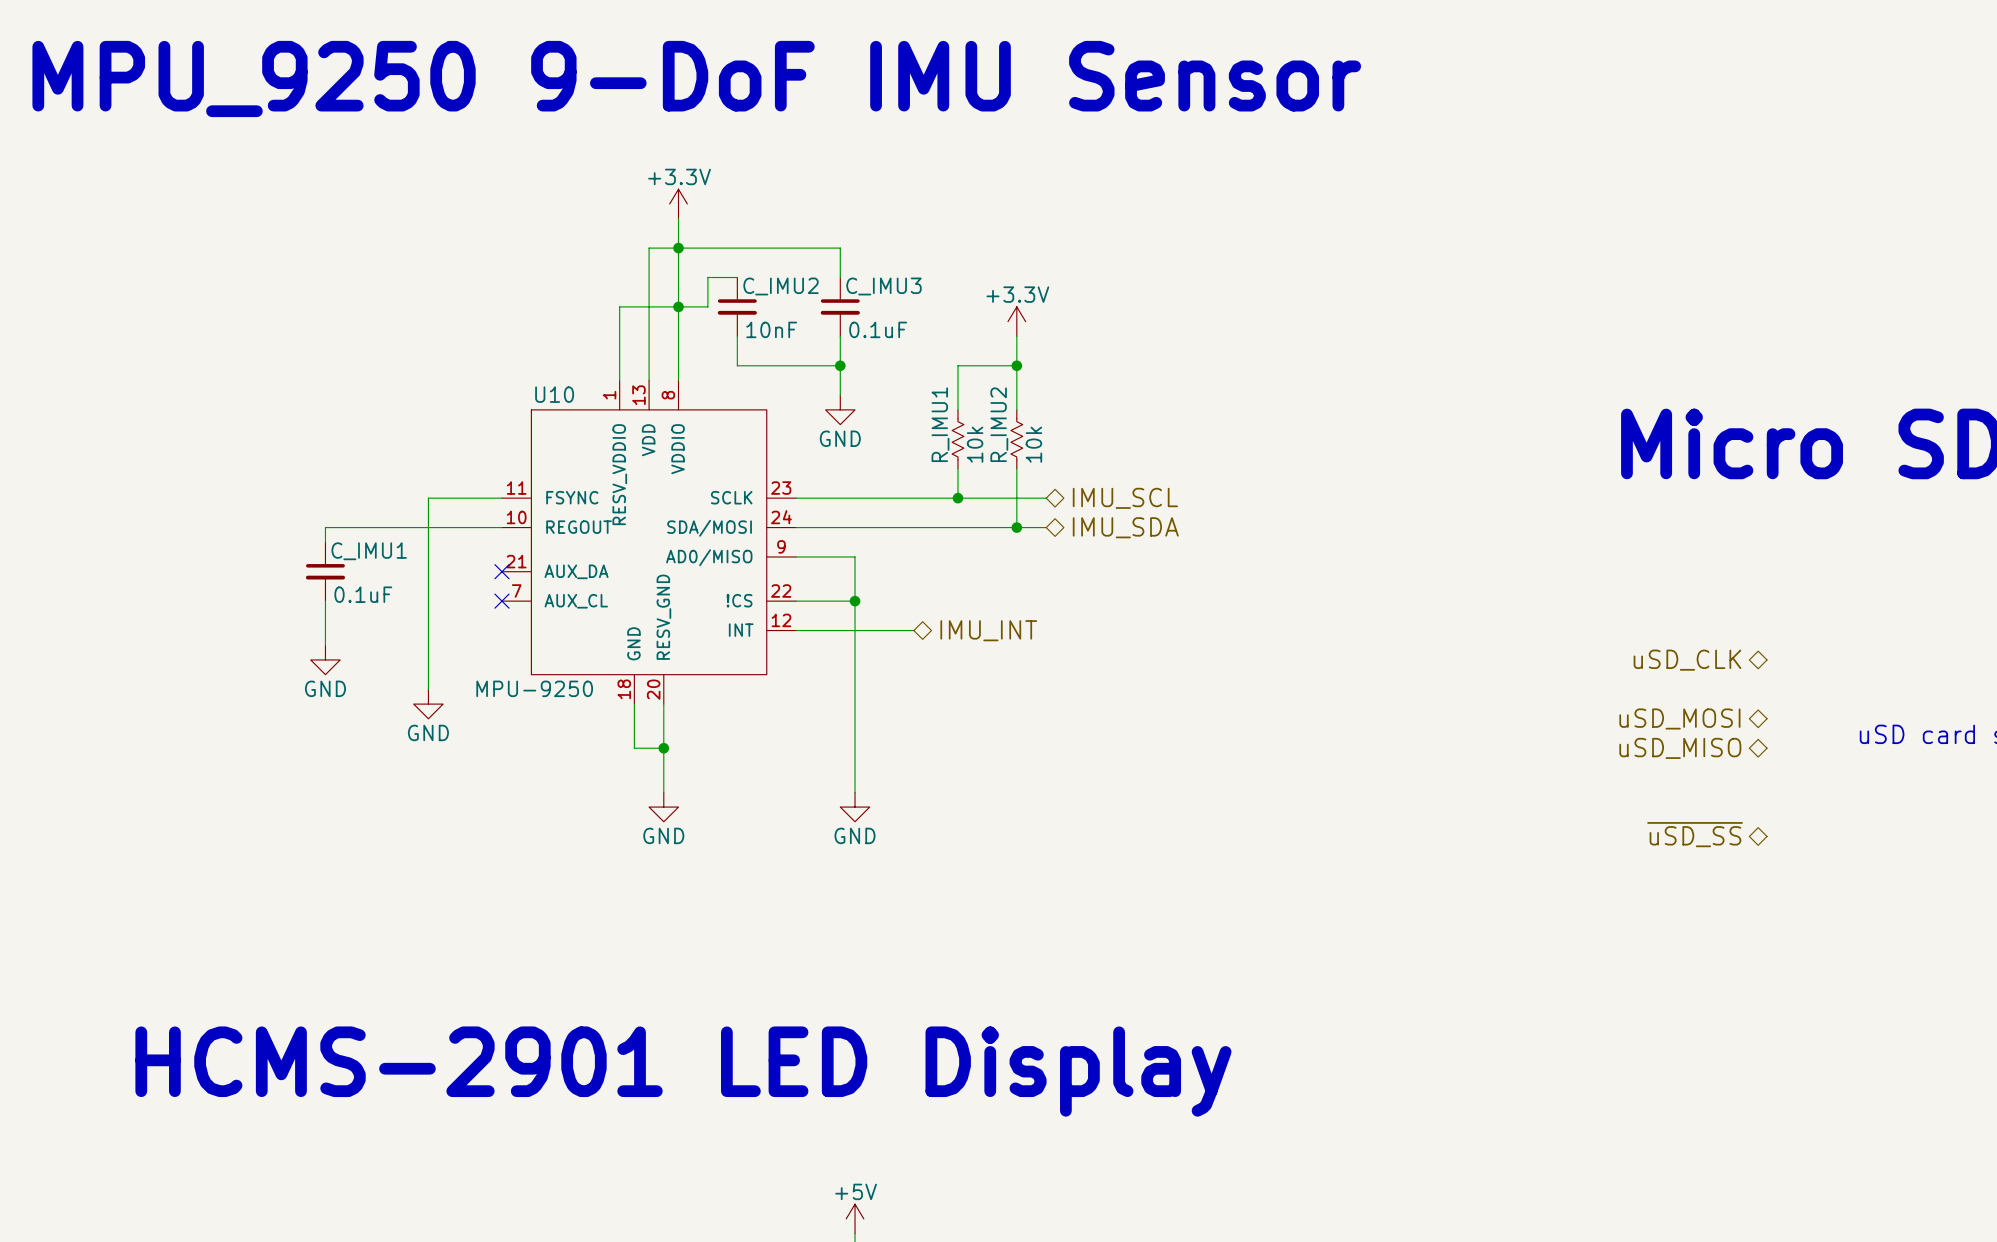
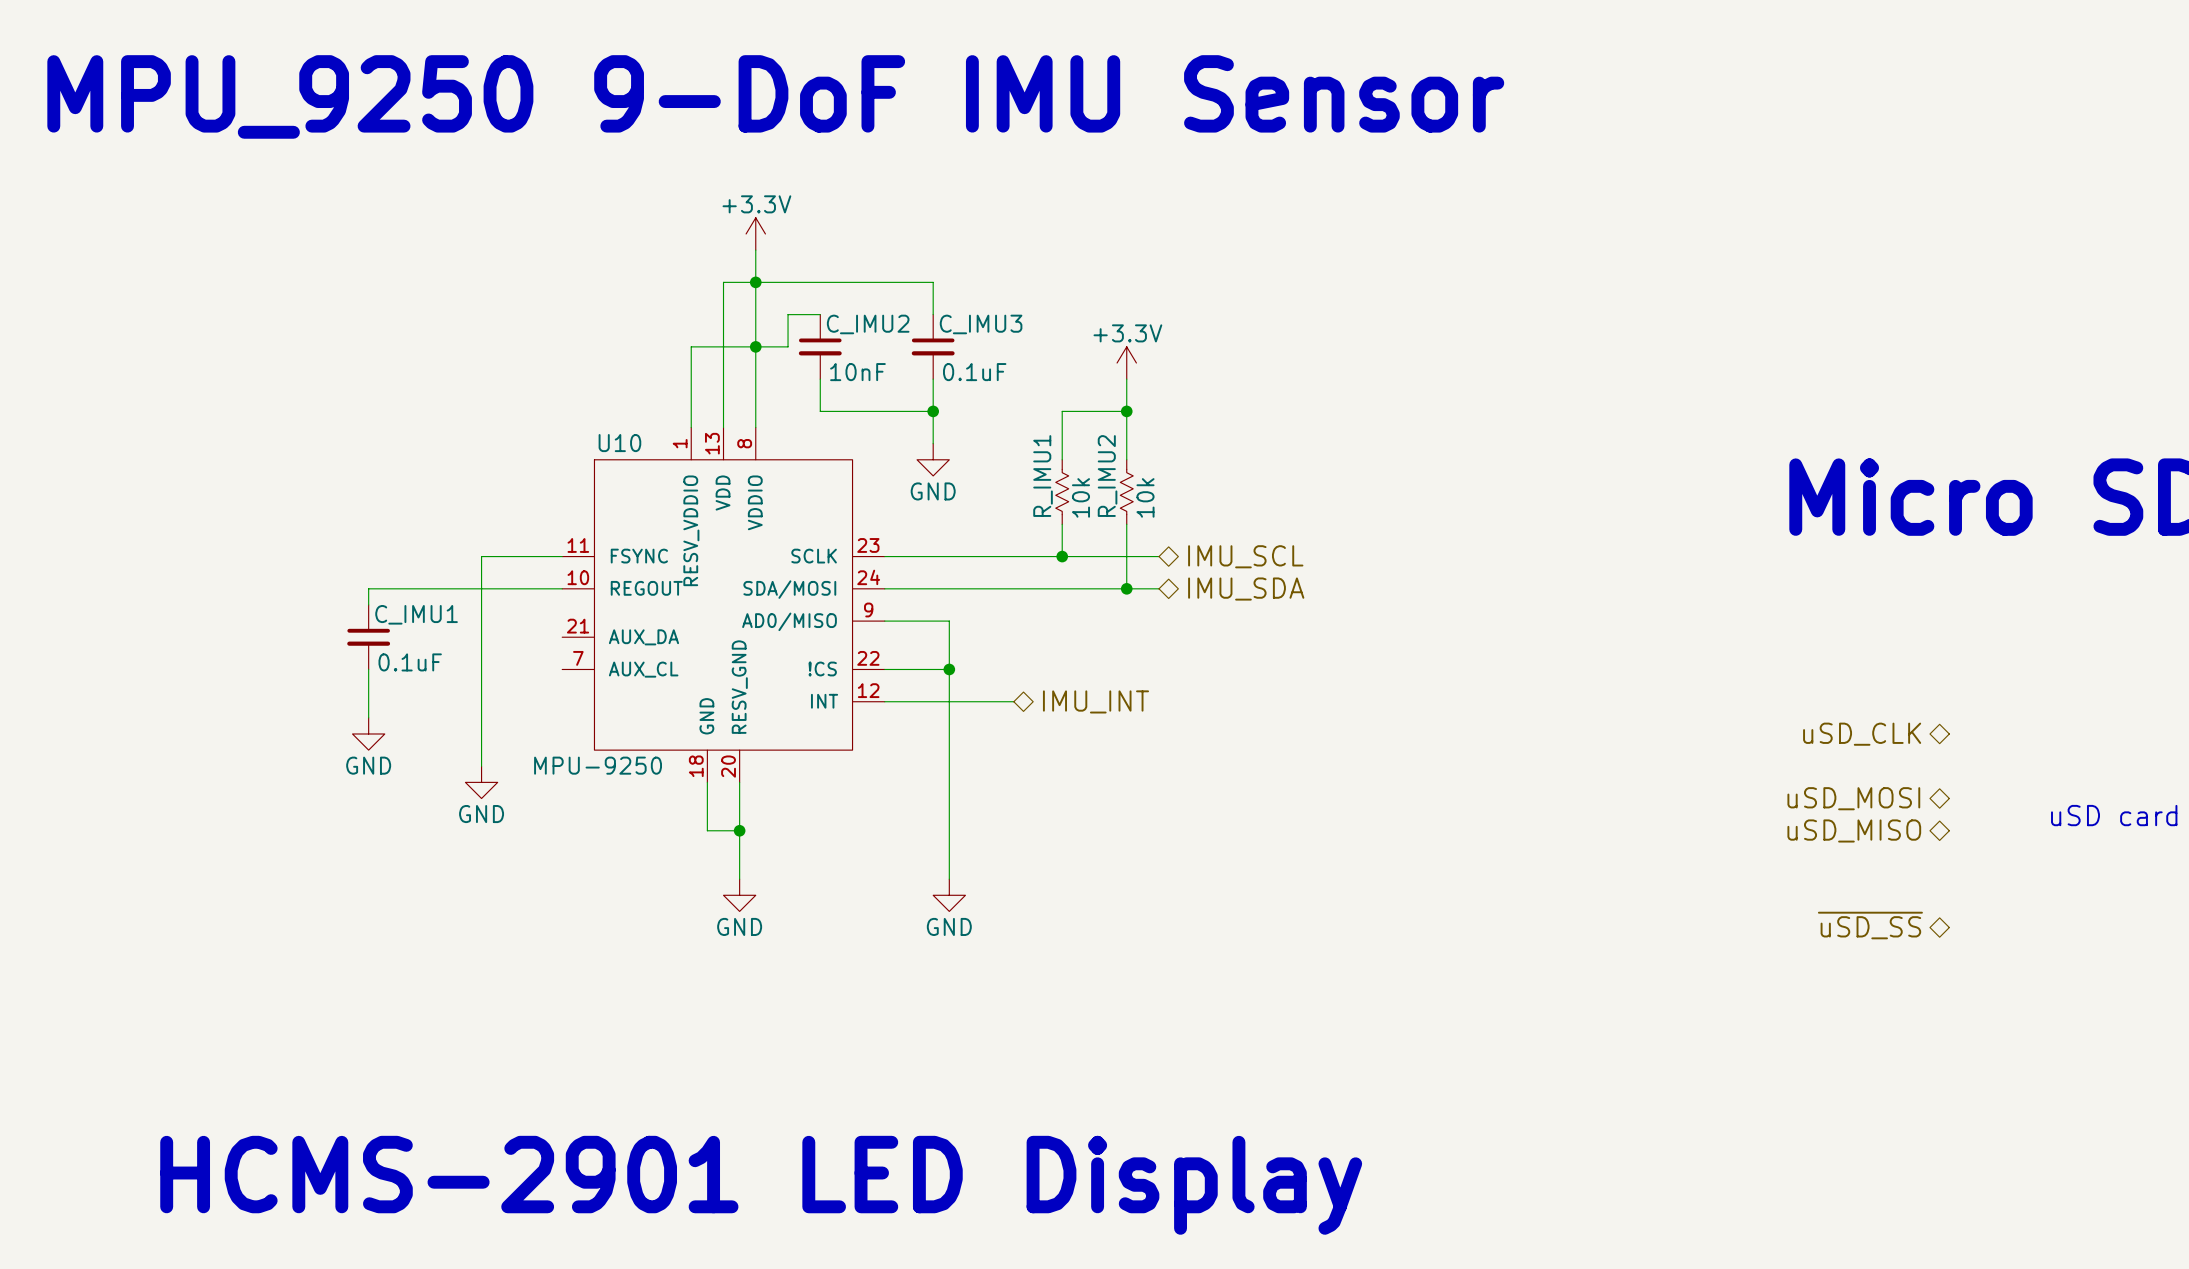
no-connect mark: (501, 571) -> none
no-connect mark: (501, 601) -> none

